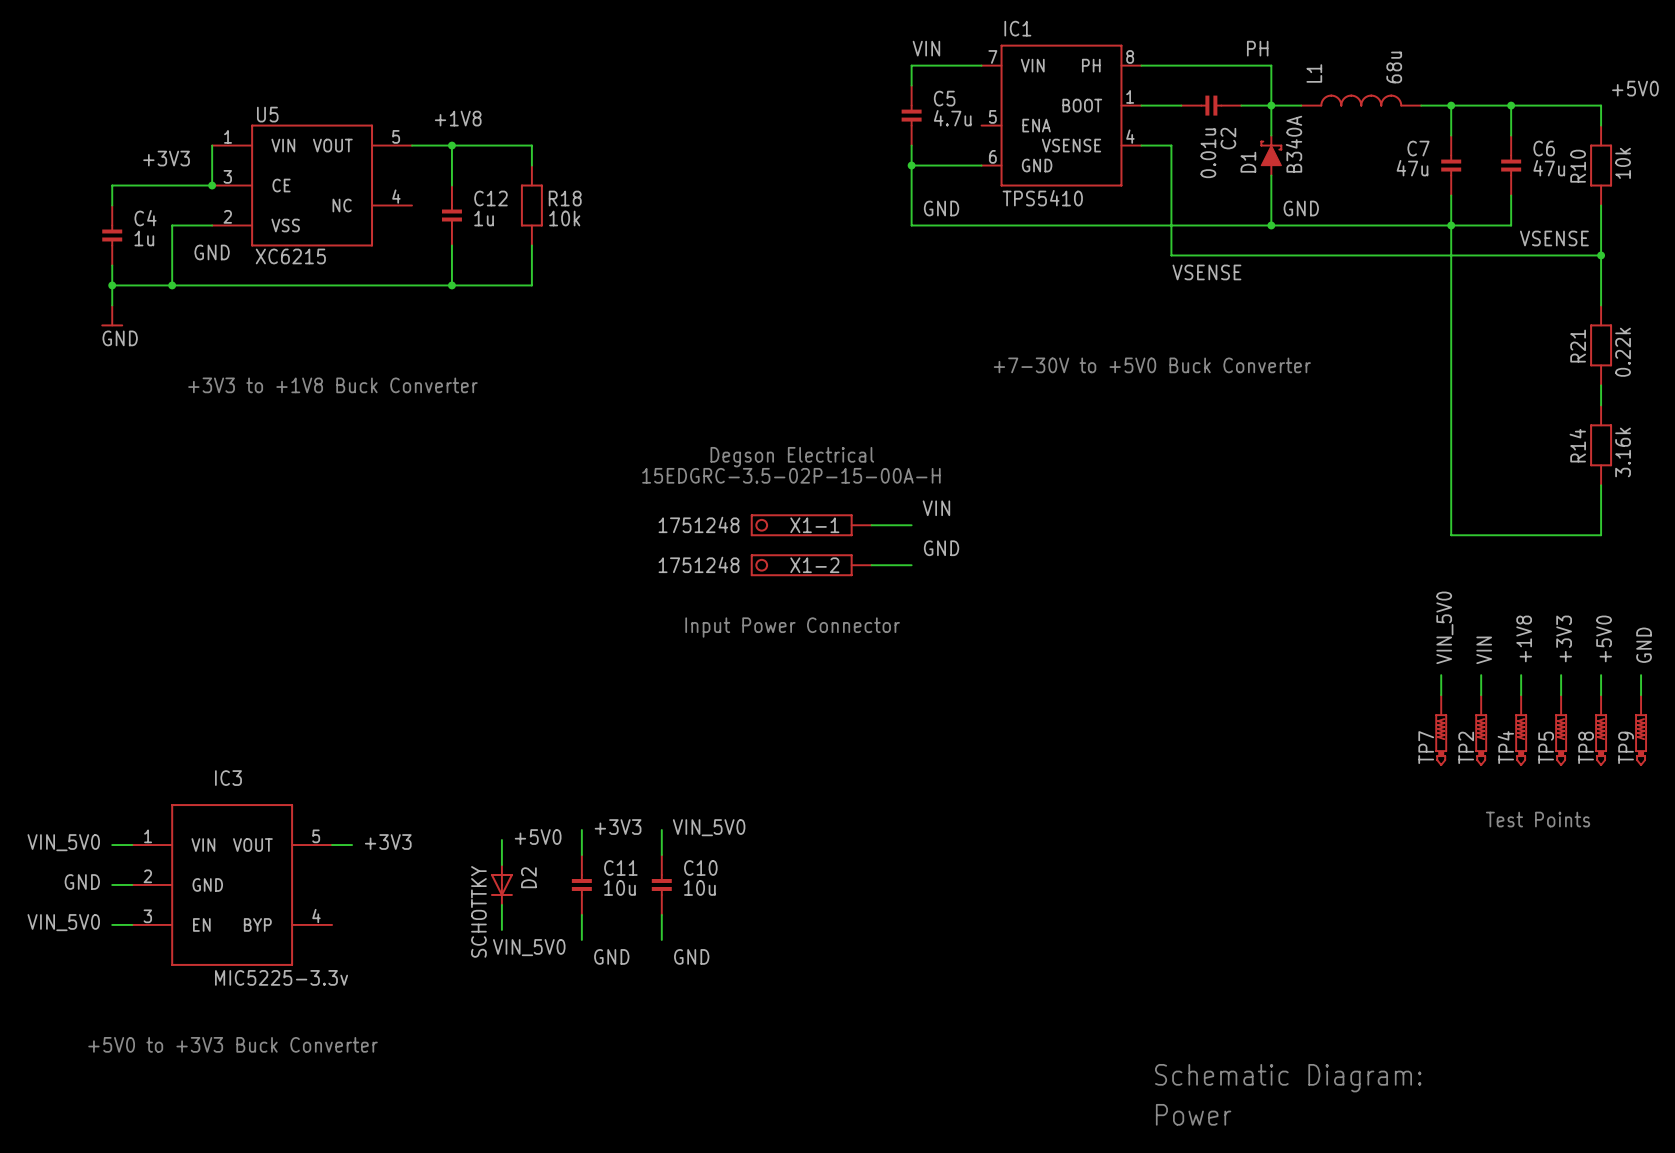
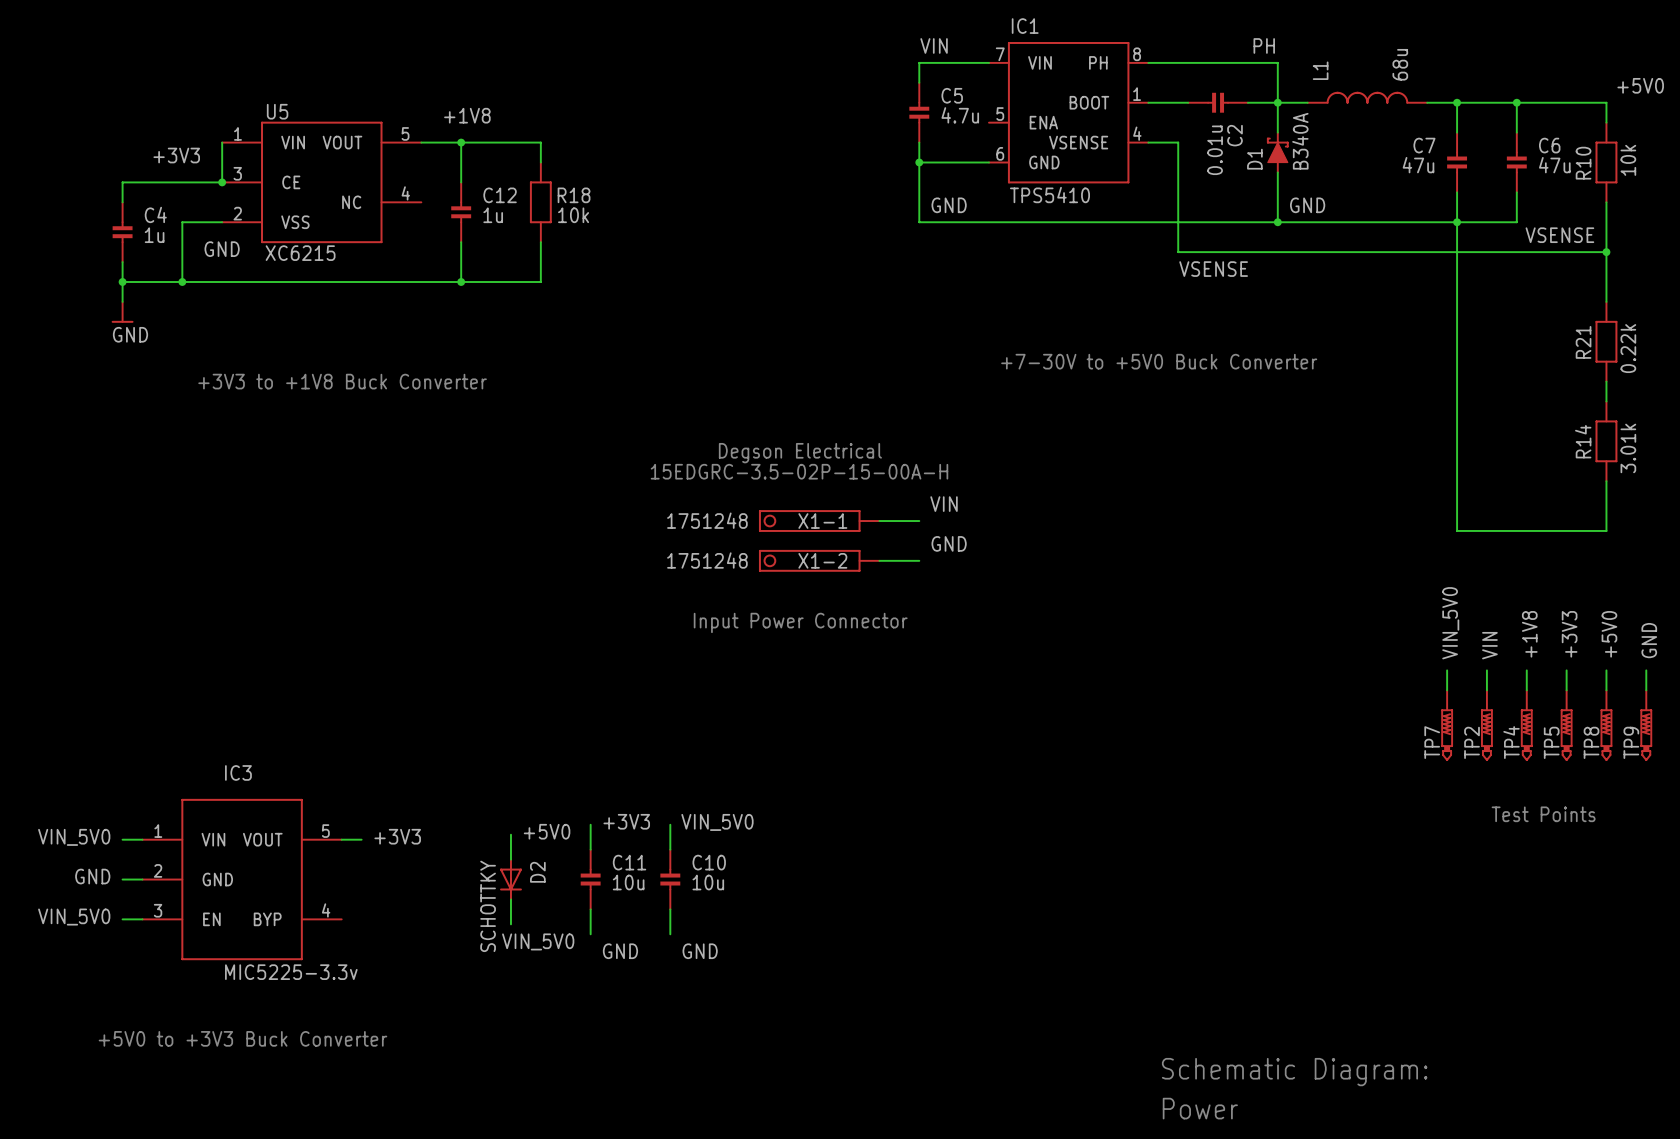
R14 value: 3.16k (1623, 452) -> 3.01k (1628, 448)

